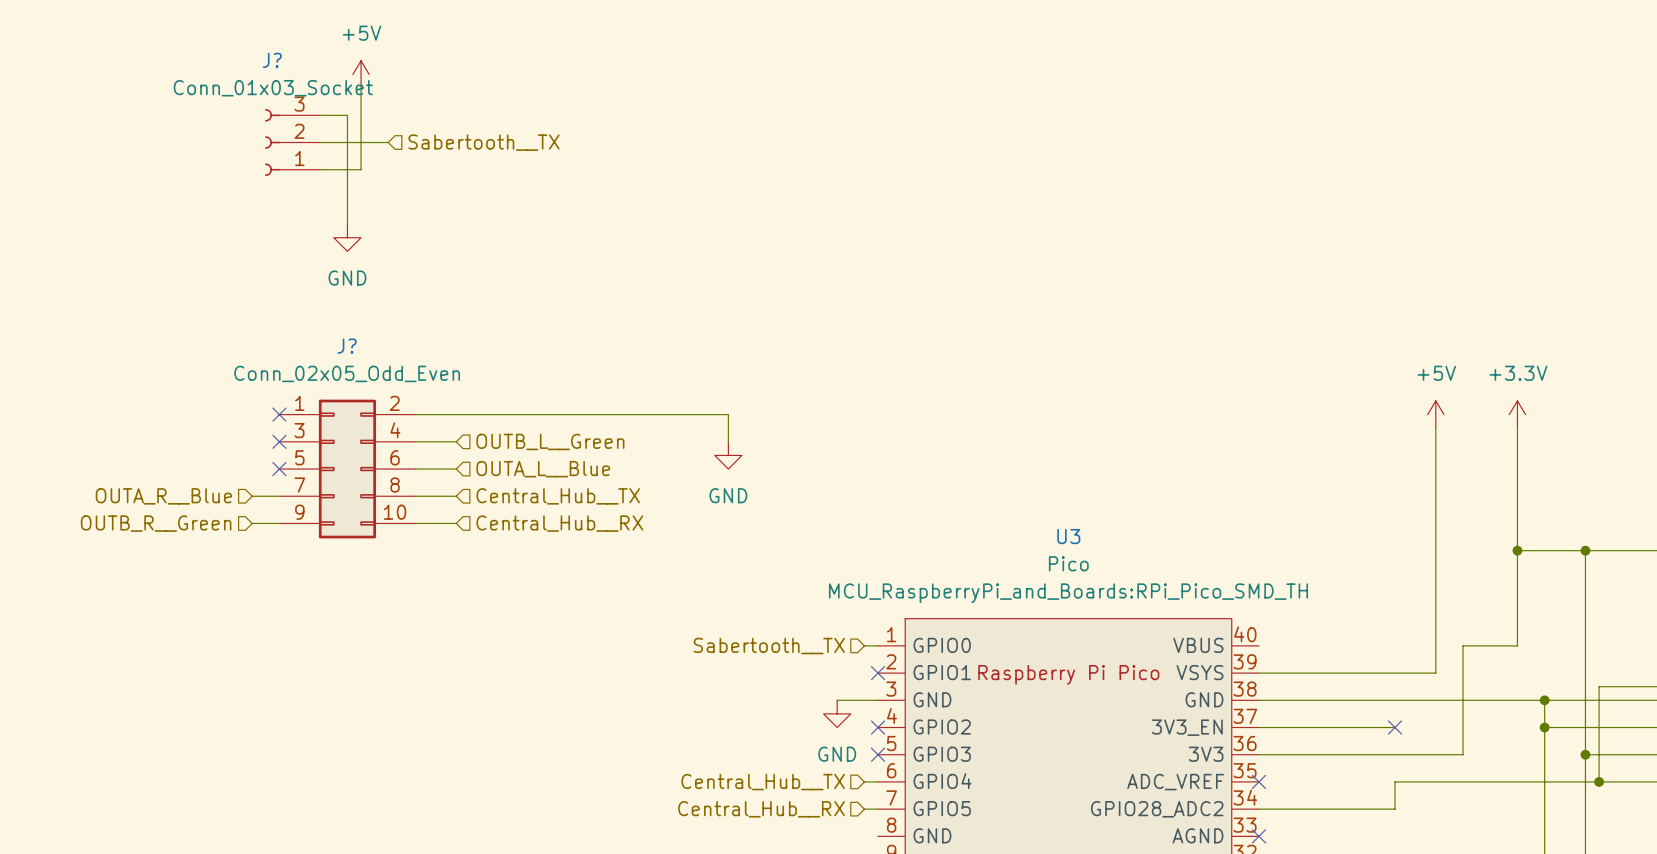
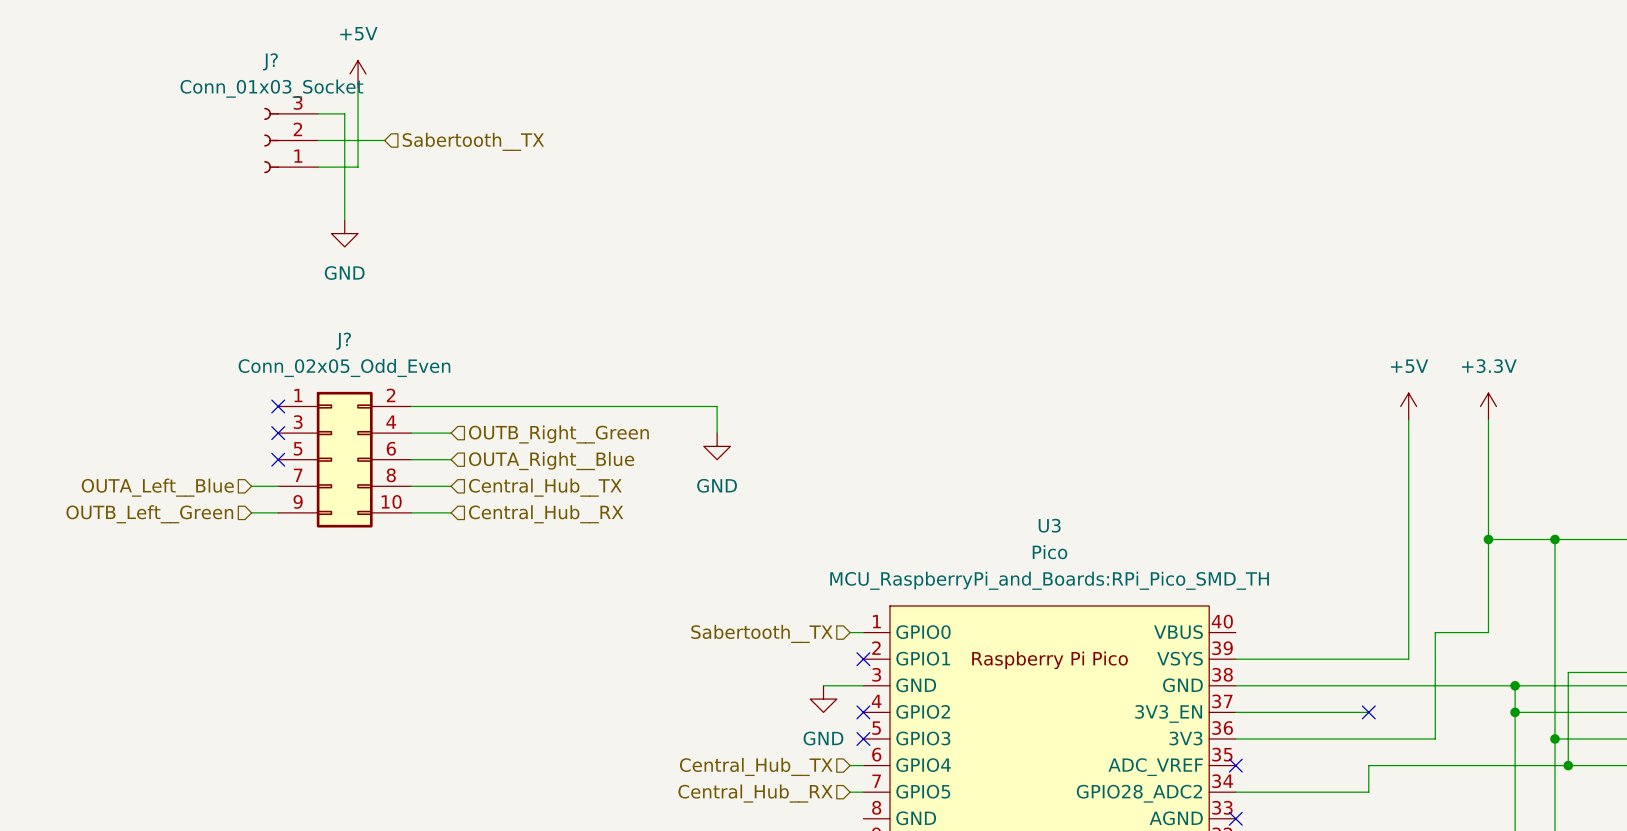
hierarchical label: OUTB_L__Green (550, 441) -> OUTB_Right__Green (558, 434)
hierarchical label: OUTA_L__Blue (543, 469) -> OUTA_Right__Blue (551, 461)
hierarchical label: OUTA_R__Blue (163, 496) -> OUTA_Left__Blue (157, 487)
hierarchical label: OUTB_R__Green (156, 523) -> OUTB_Left__Green (149, 514)

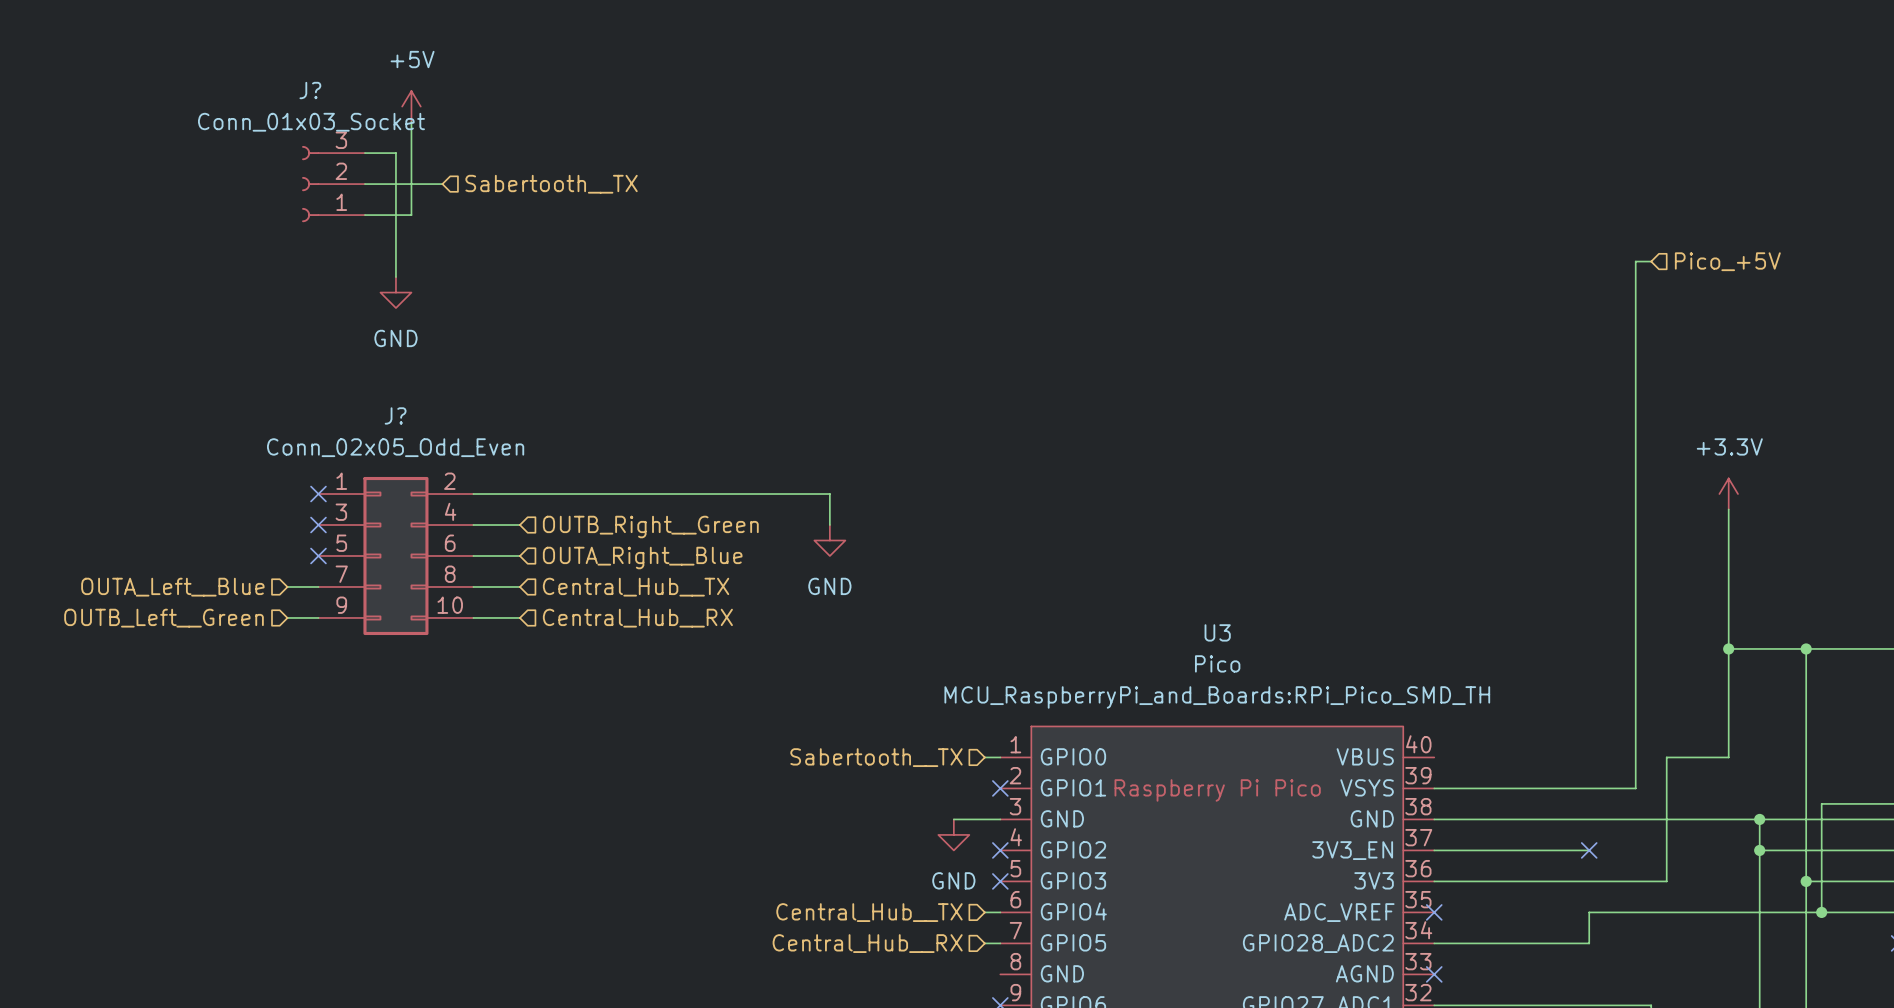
wire: none -> (1651, 261) (1635, 261) (1635, 509)
hierarchical label: none -> Pico_+5V (1727, 261)
power symbol: +5V (1408, 406) -> none

